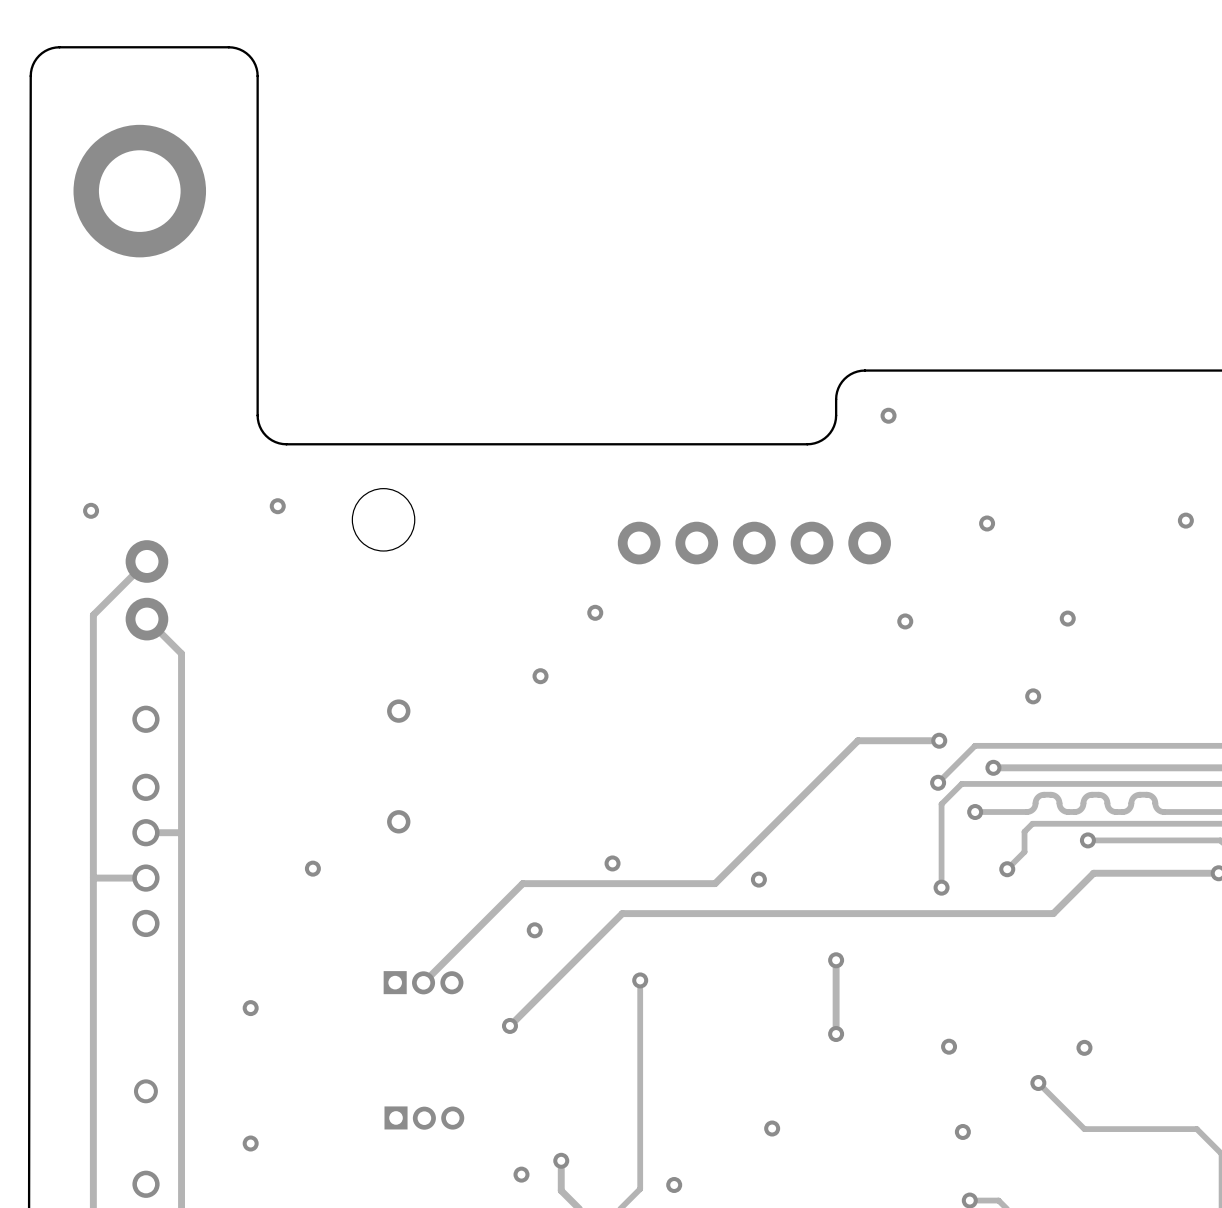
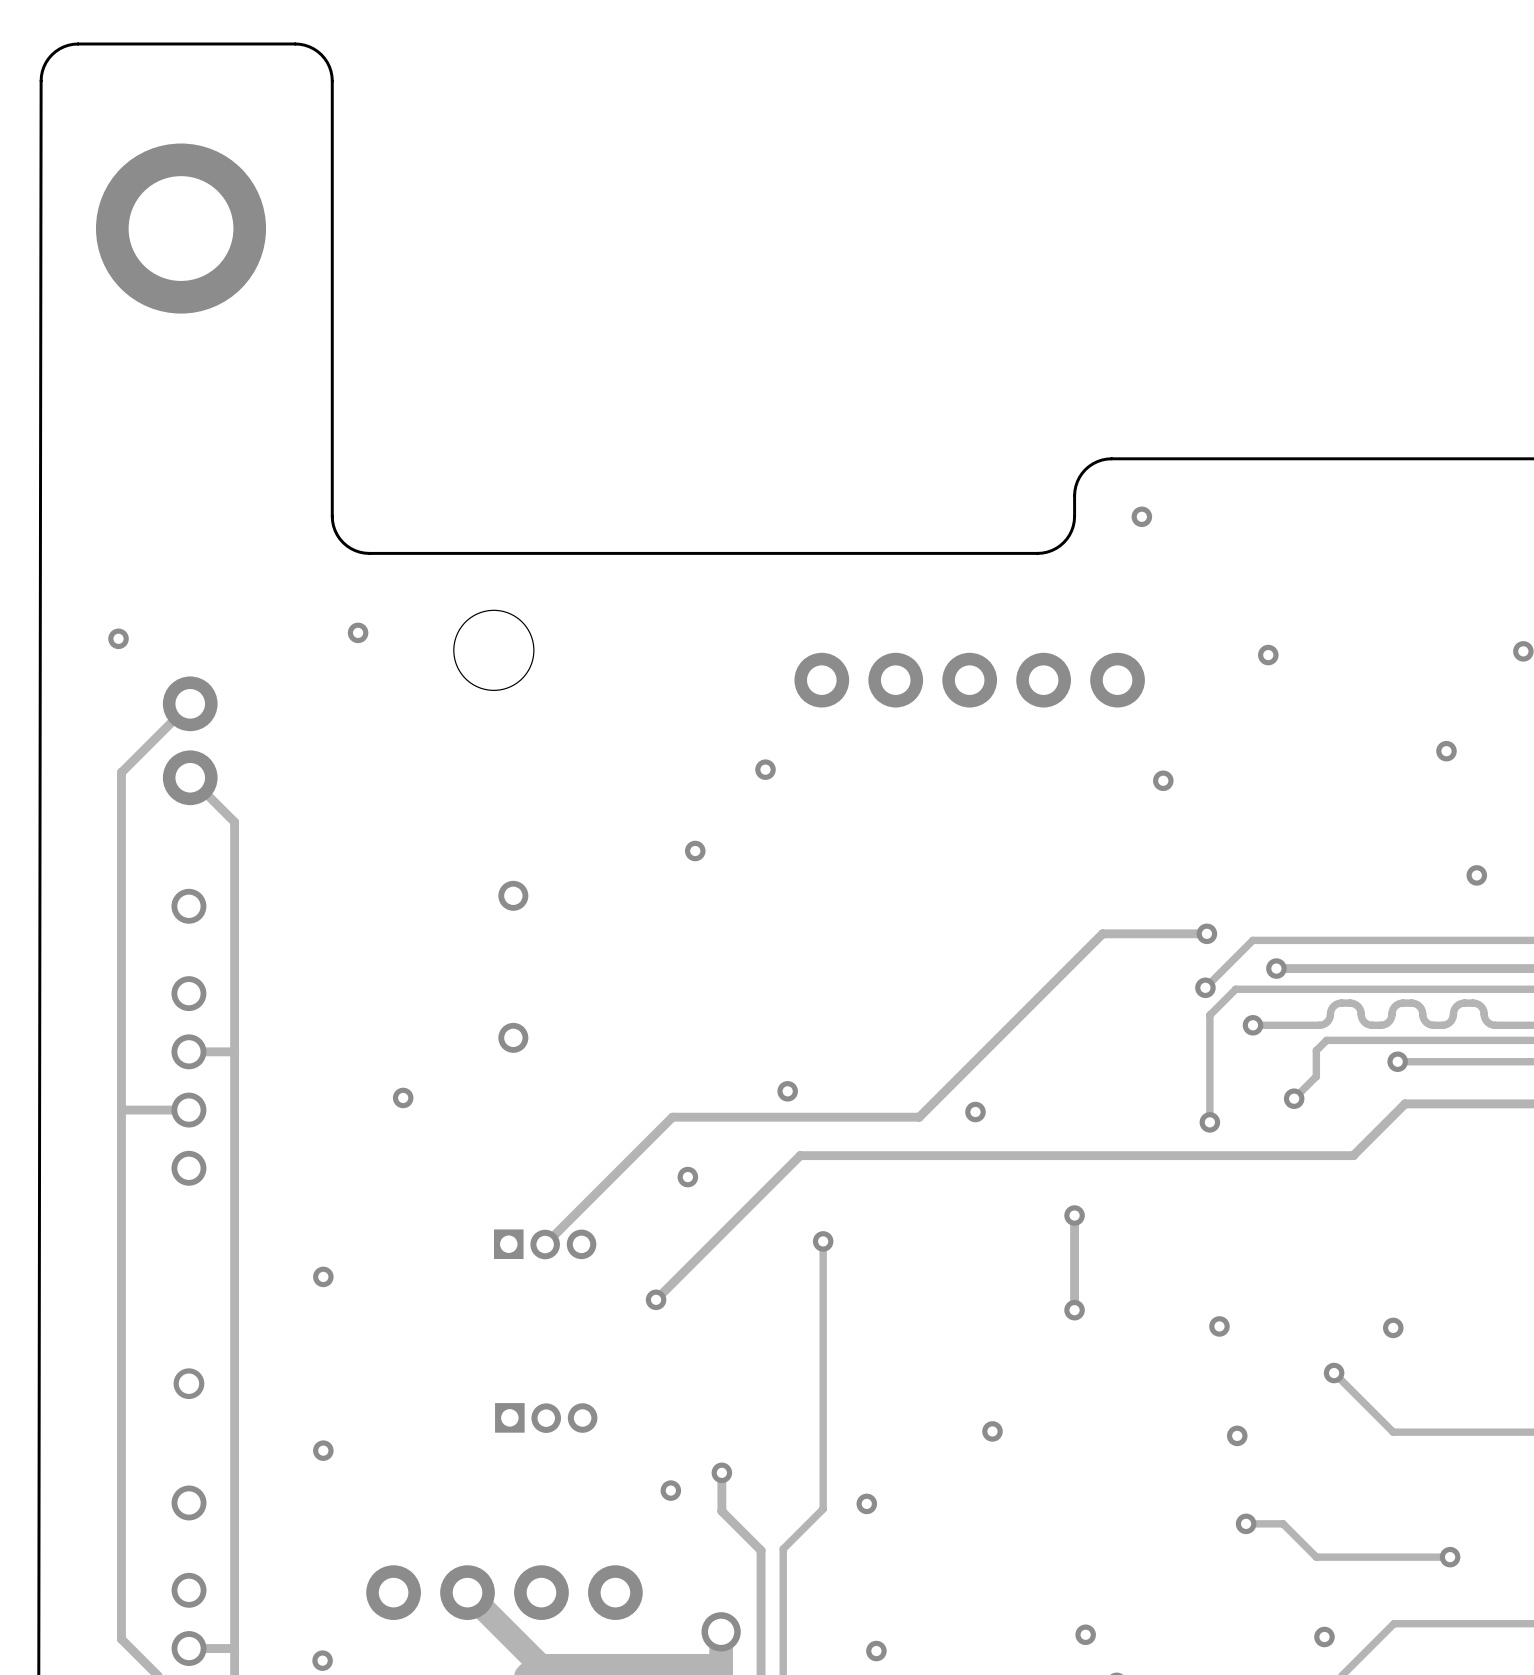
via: none -> (1446, 751)
via: (1067, 618) -> none
via: none -> (1476, 875)
via: (1033, 696) -> none

